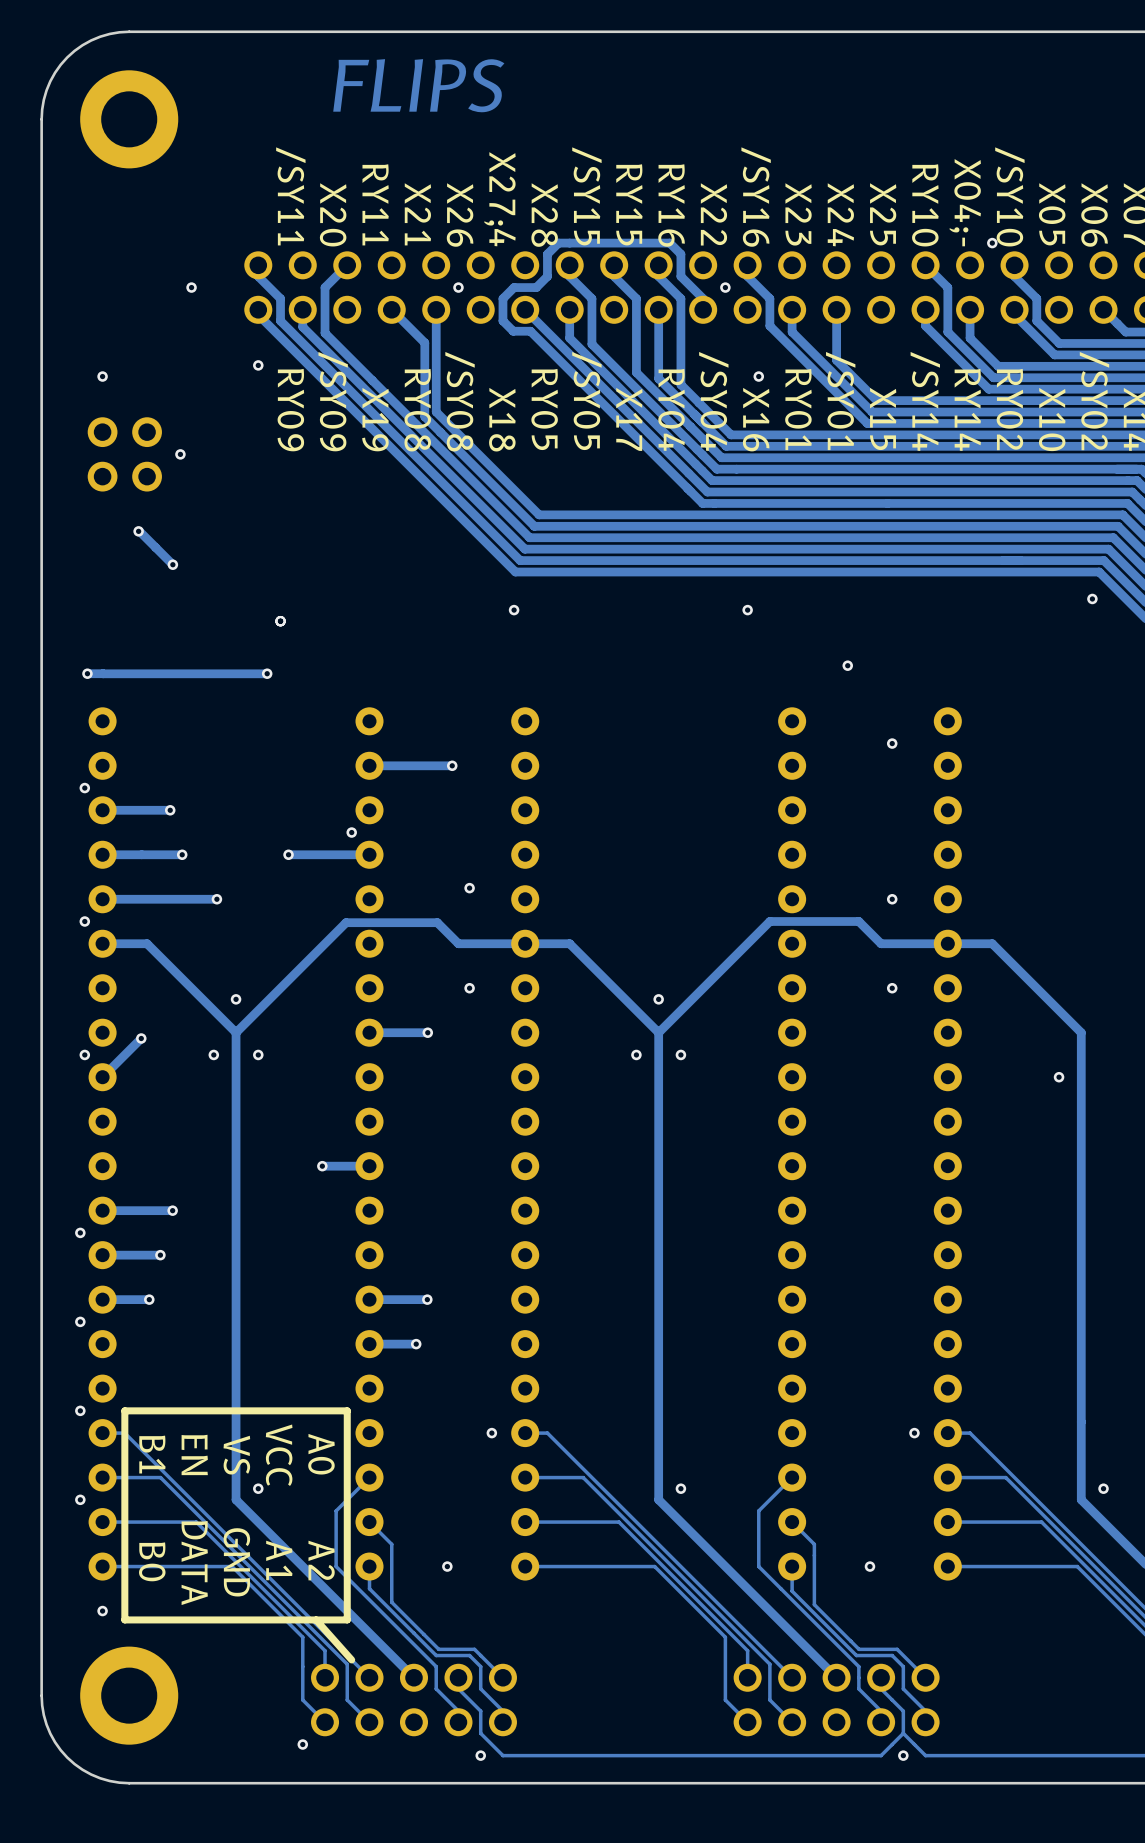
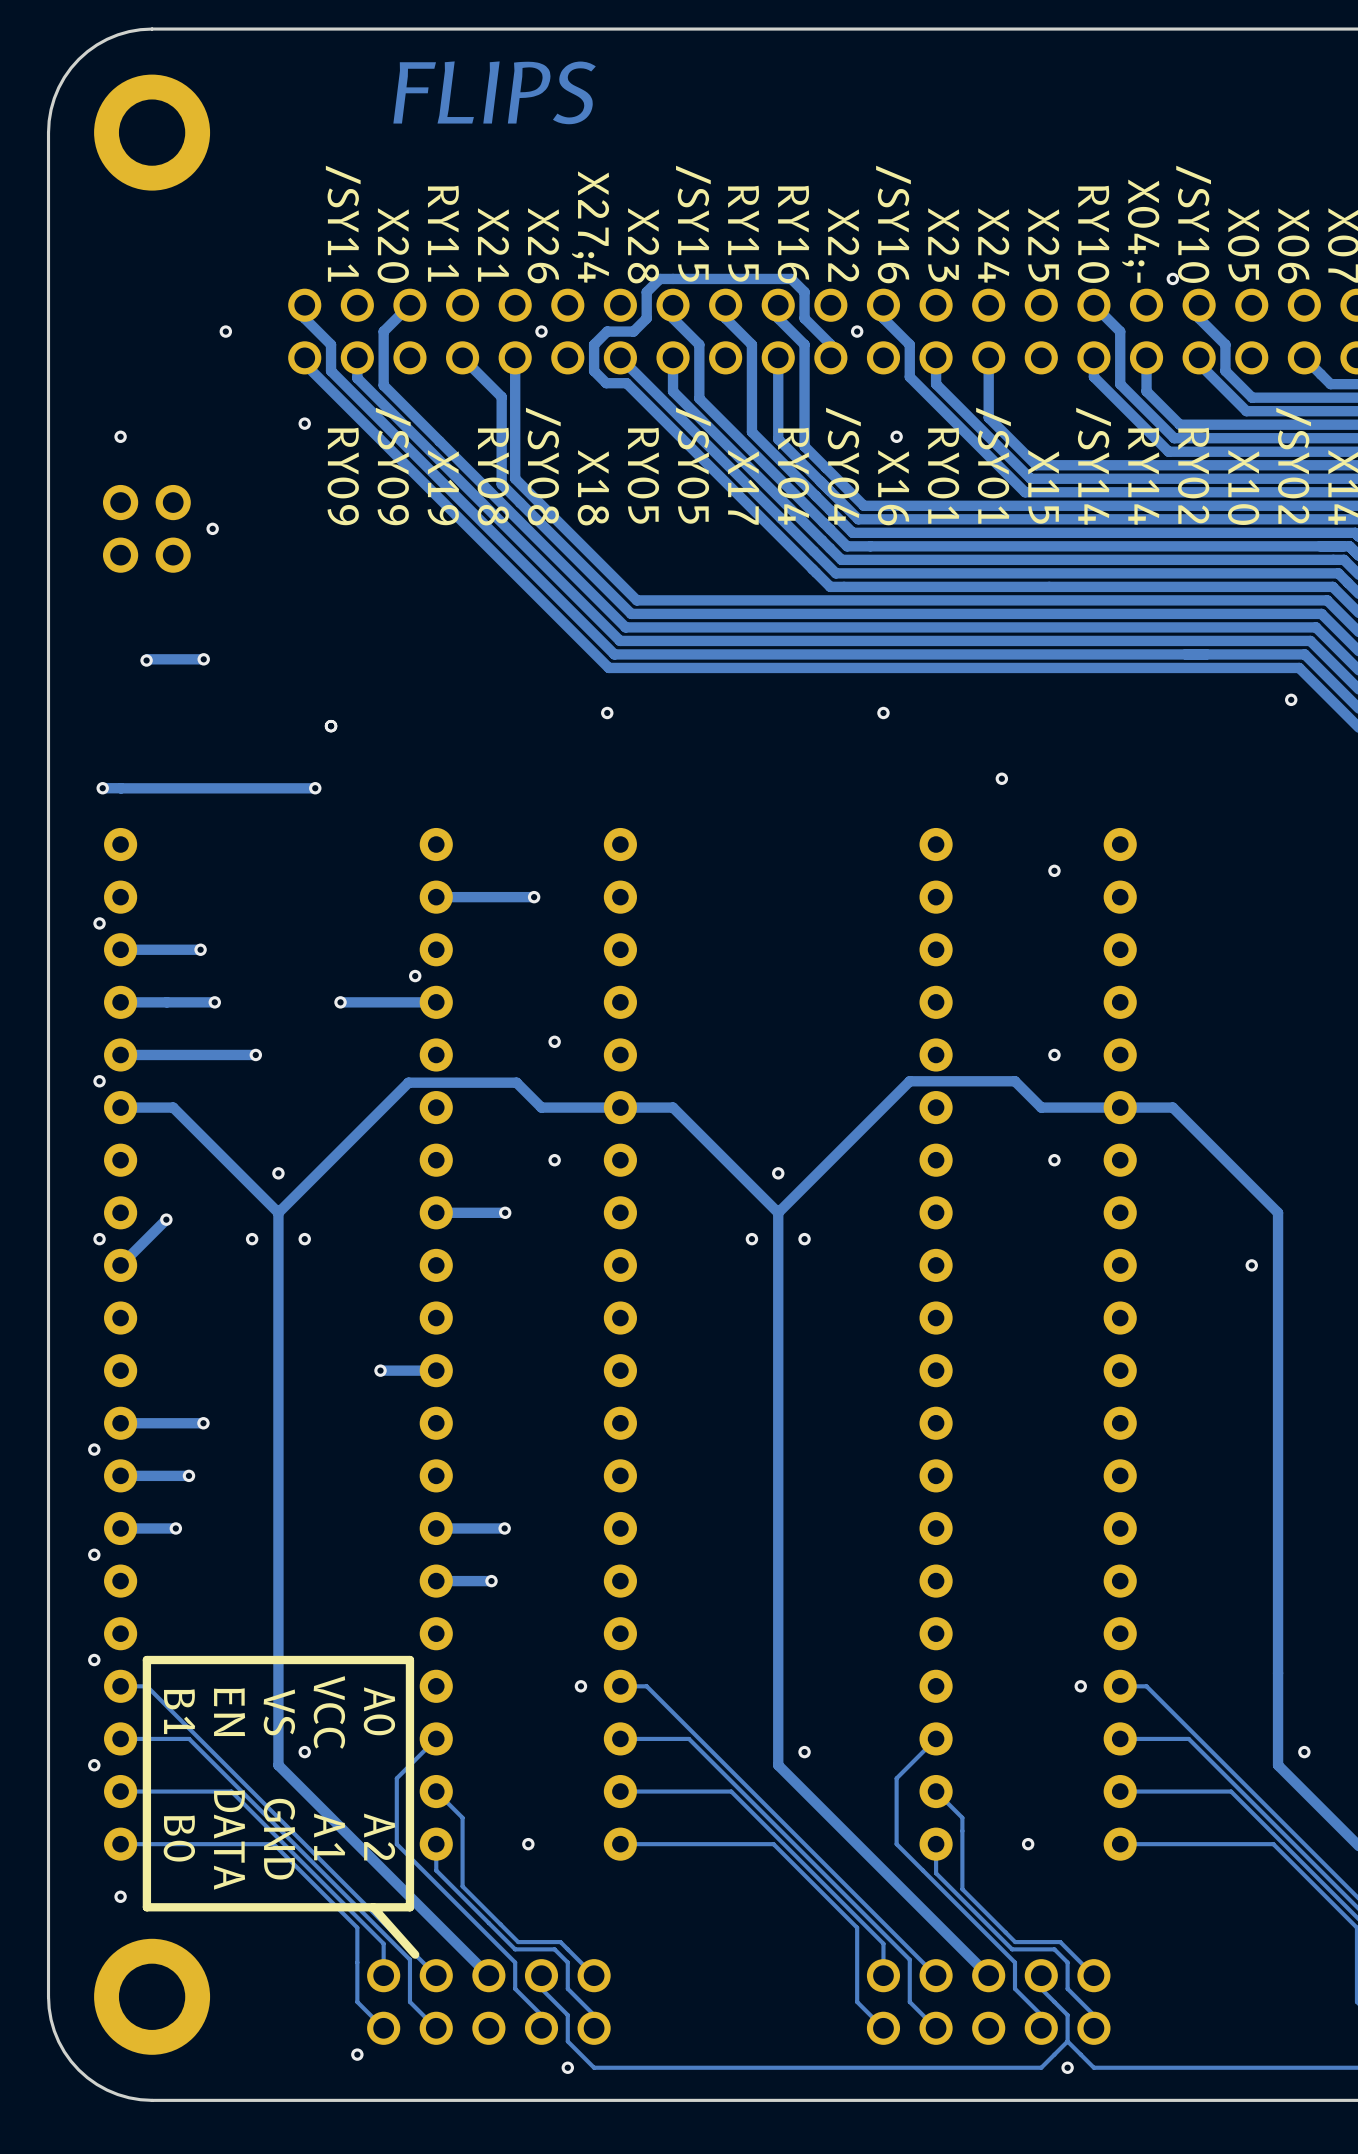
track: (138, 531) (172, 564) -> (146, 660) (203, 659)
via position: (138, 531) -> (146, 660)

